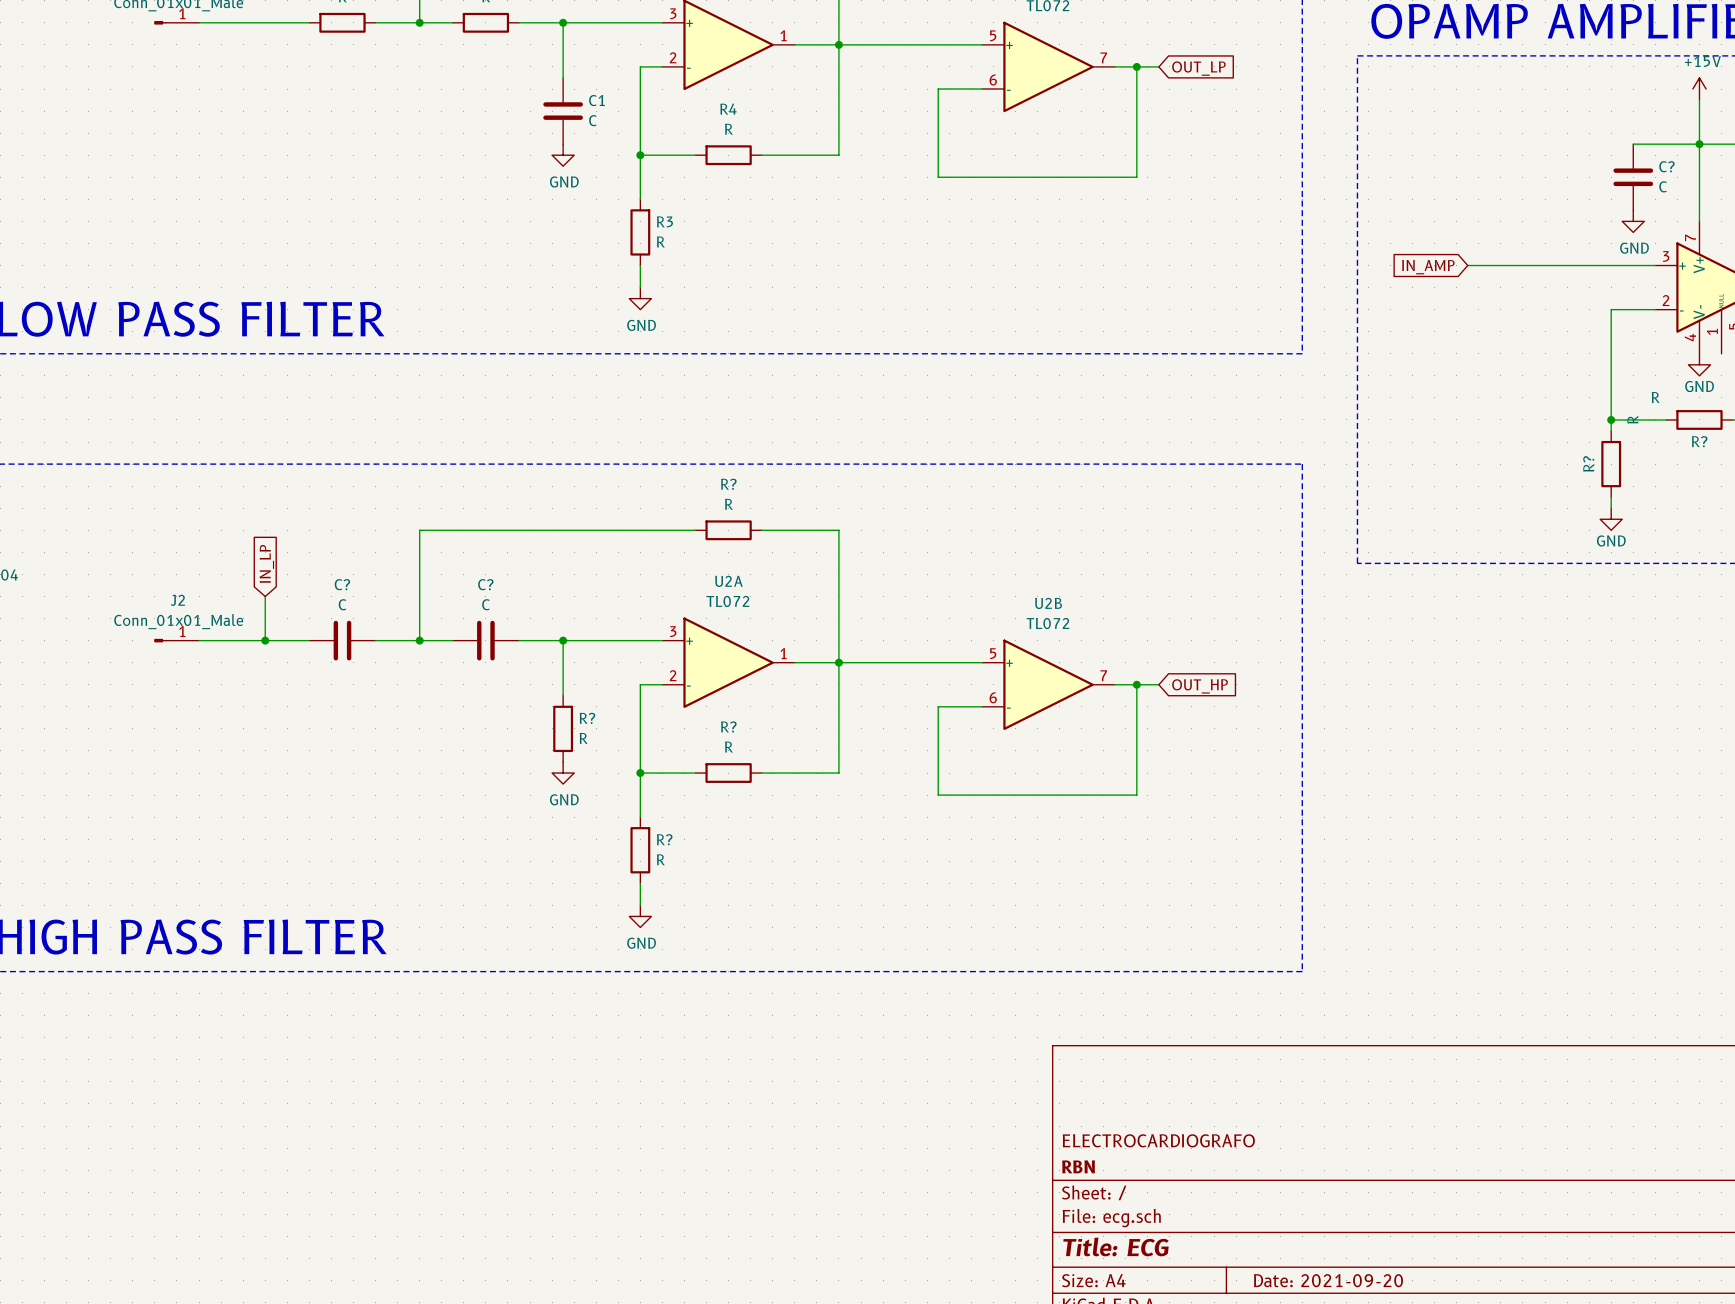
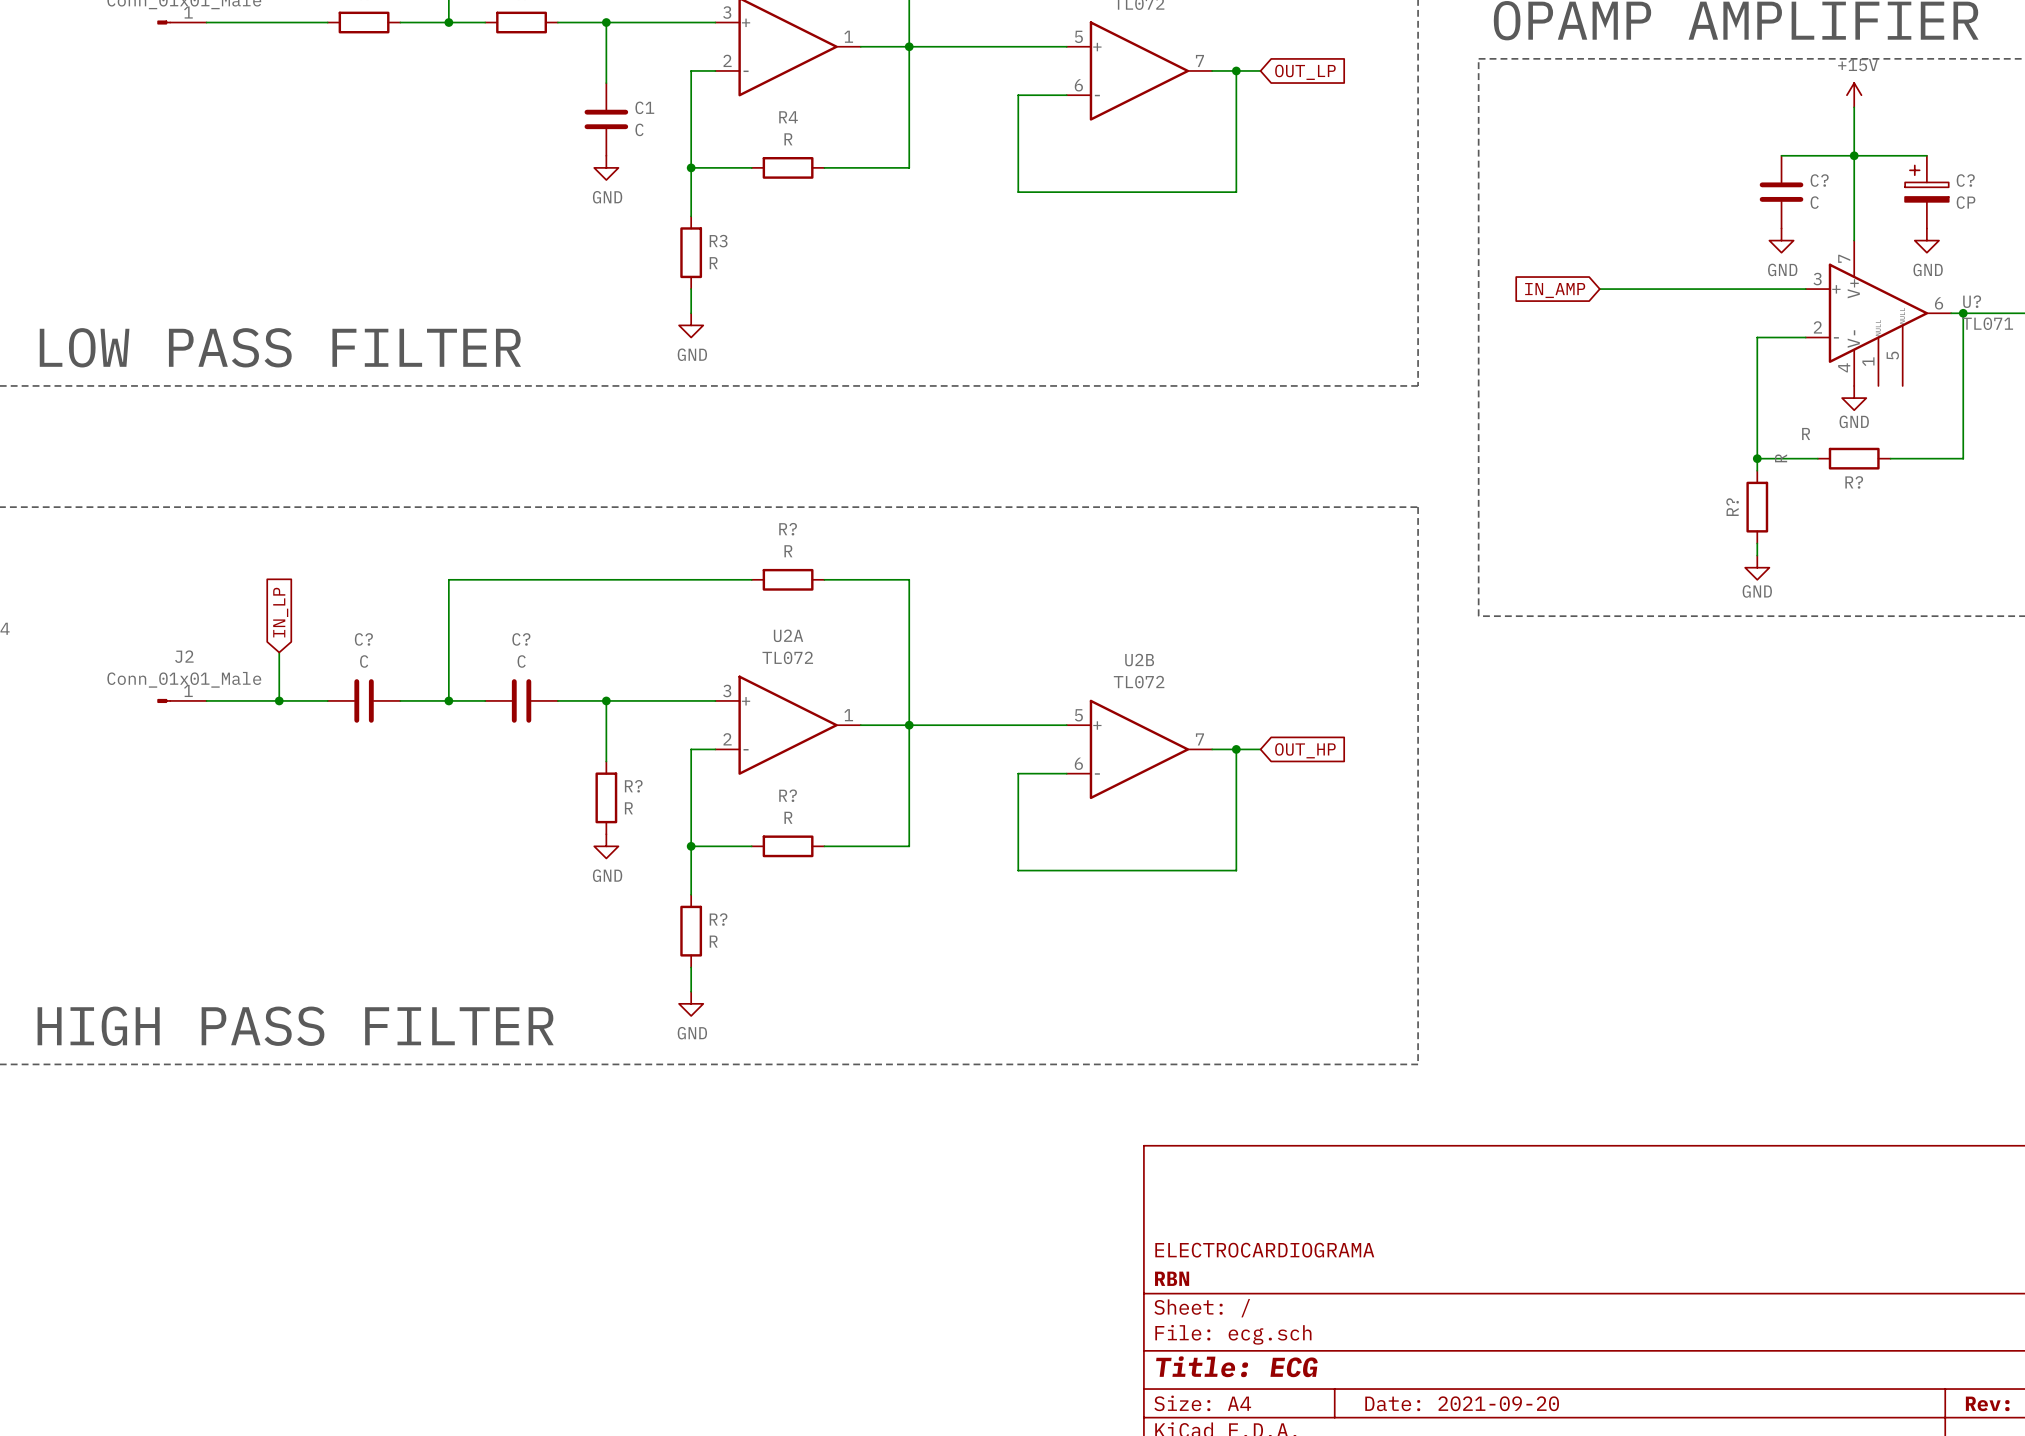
title block: ELECTROCARDIOGRAFO (1158, 1140) -> ELECTROCARDIOGRAMA (1264, 1250)

